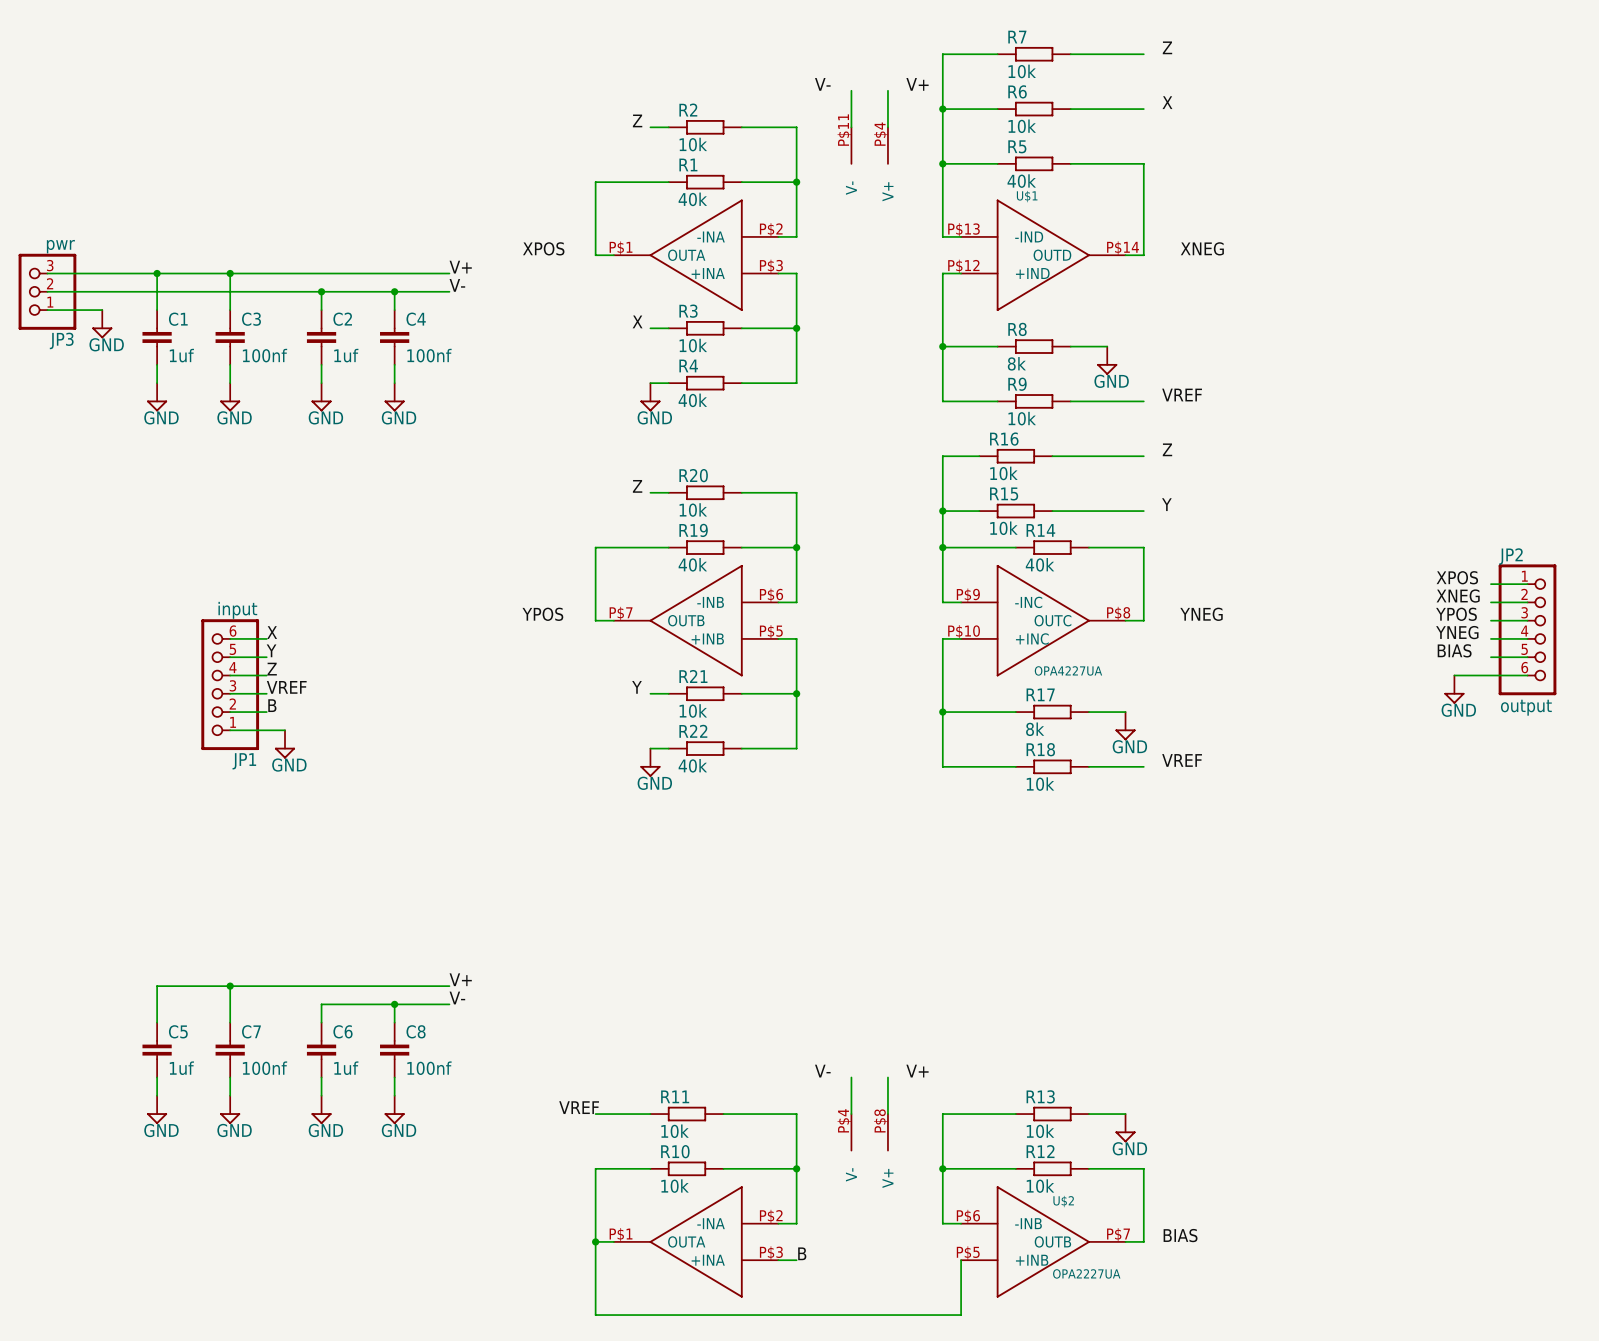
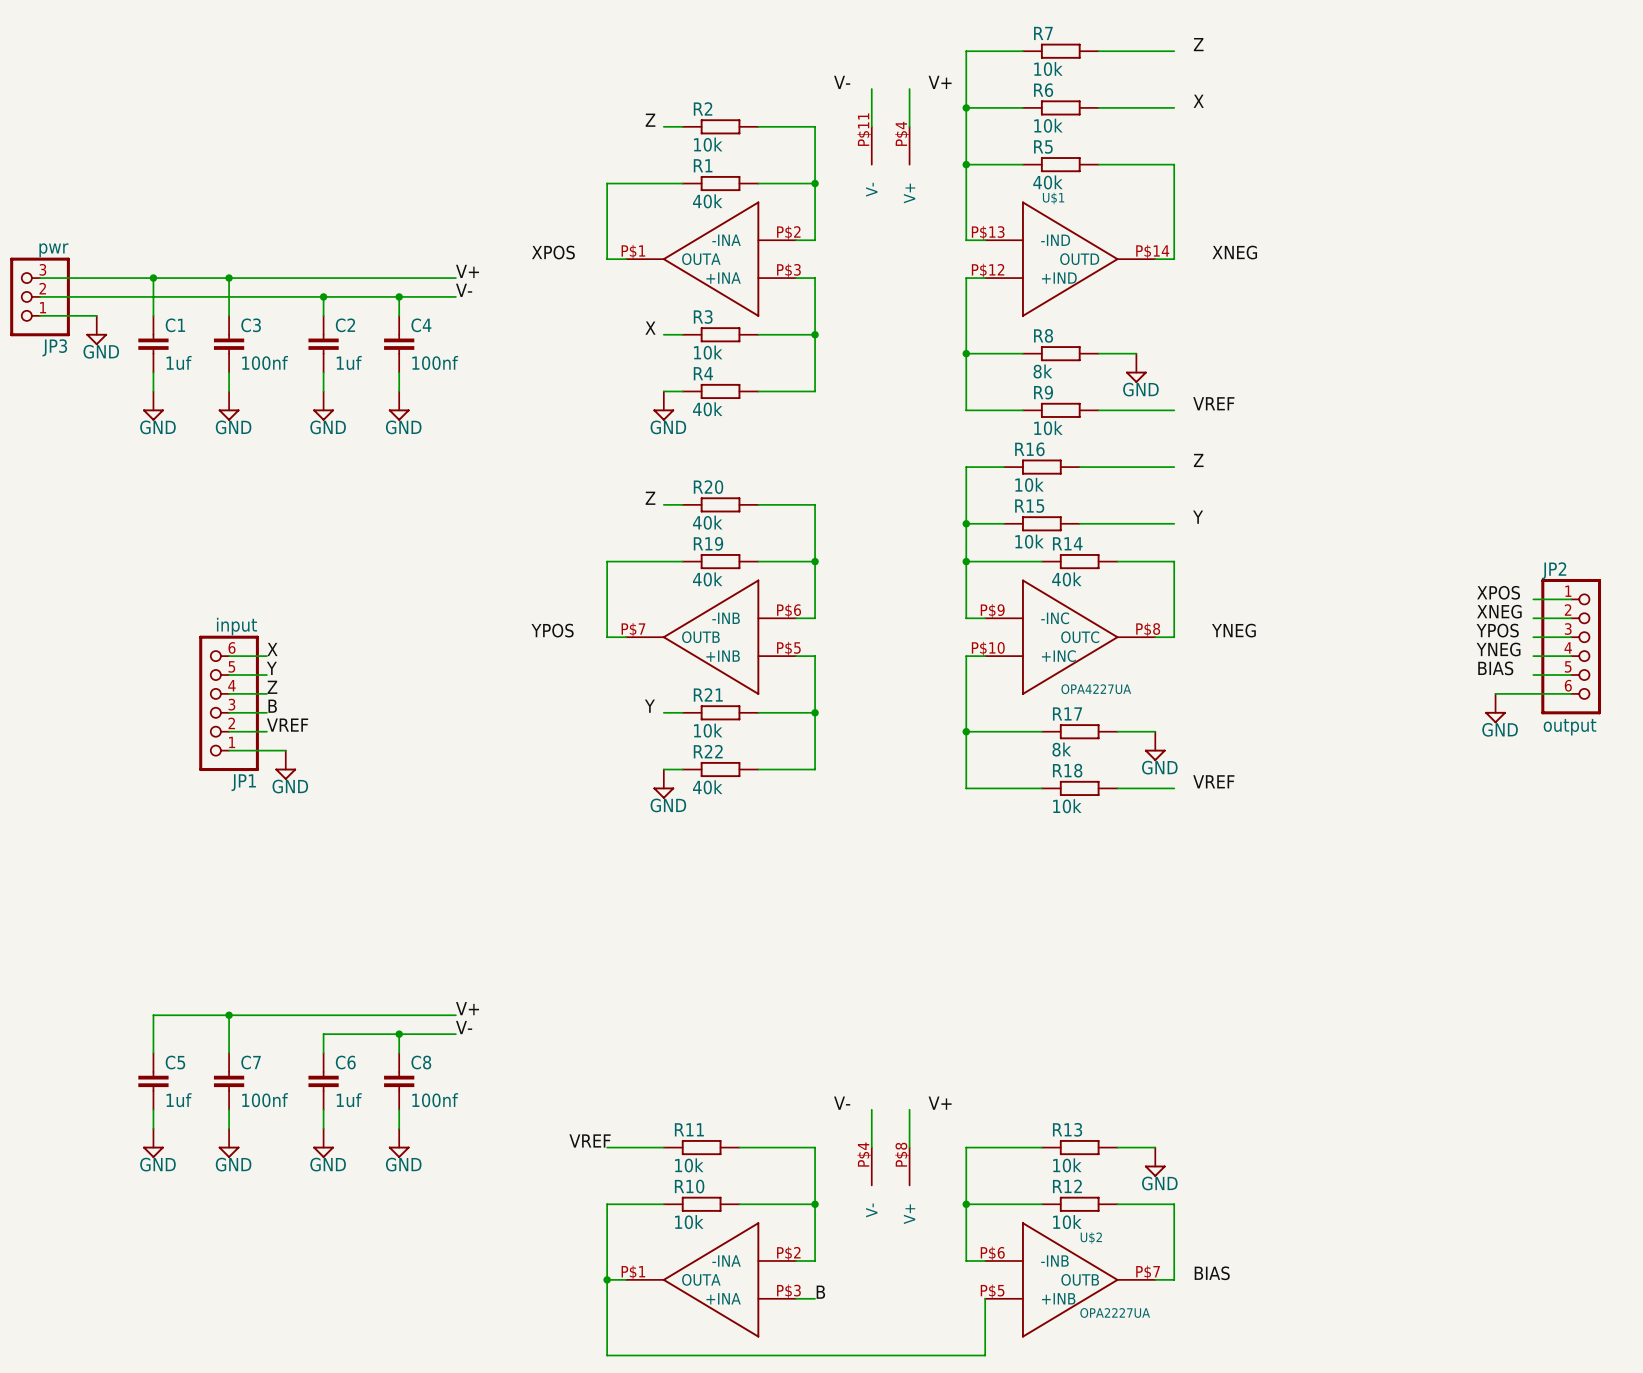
R20 value: 10k (693, 509) -> 40k (707, 522)
label: VREF (286, 687) -> B (272, 706)
label: B (272, 705) -> VREF (287, 725)

